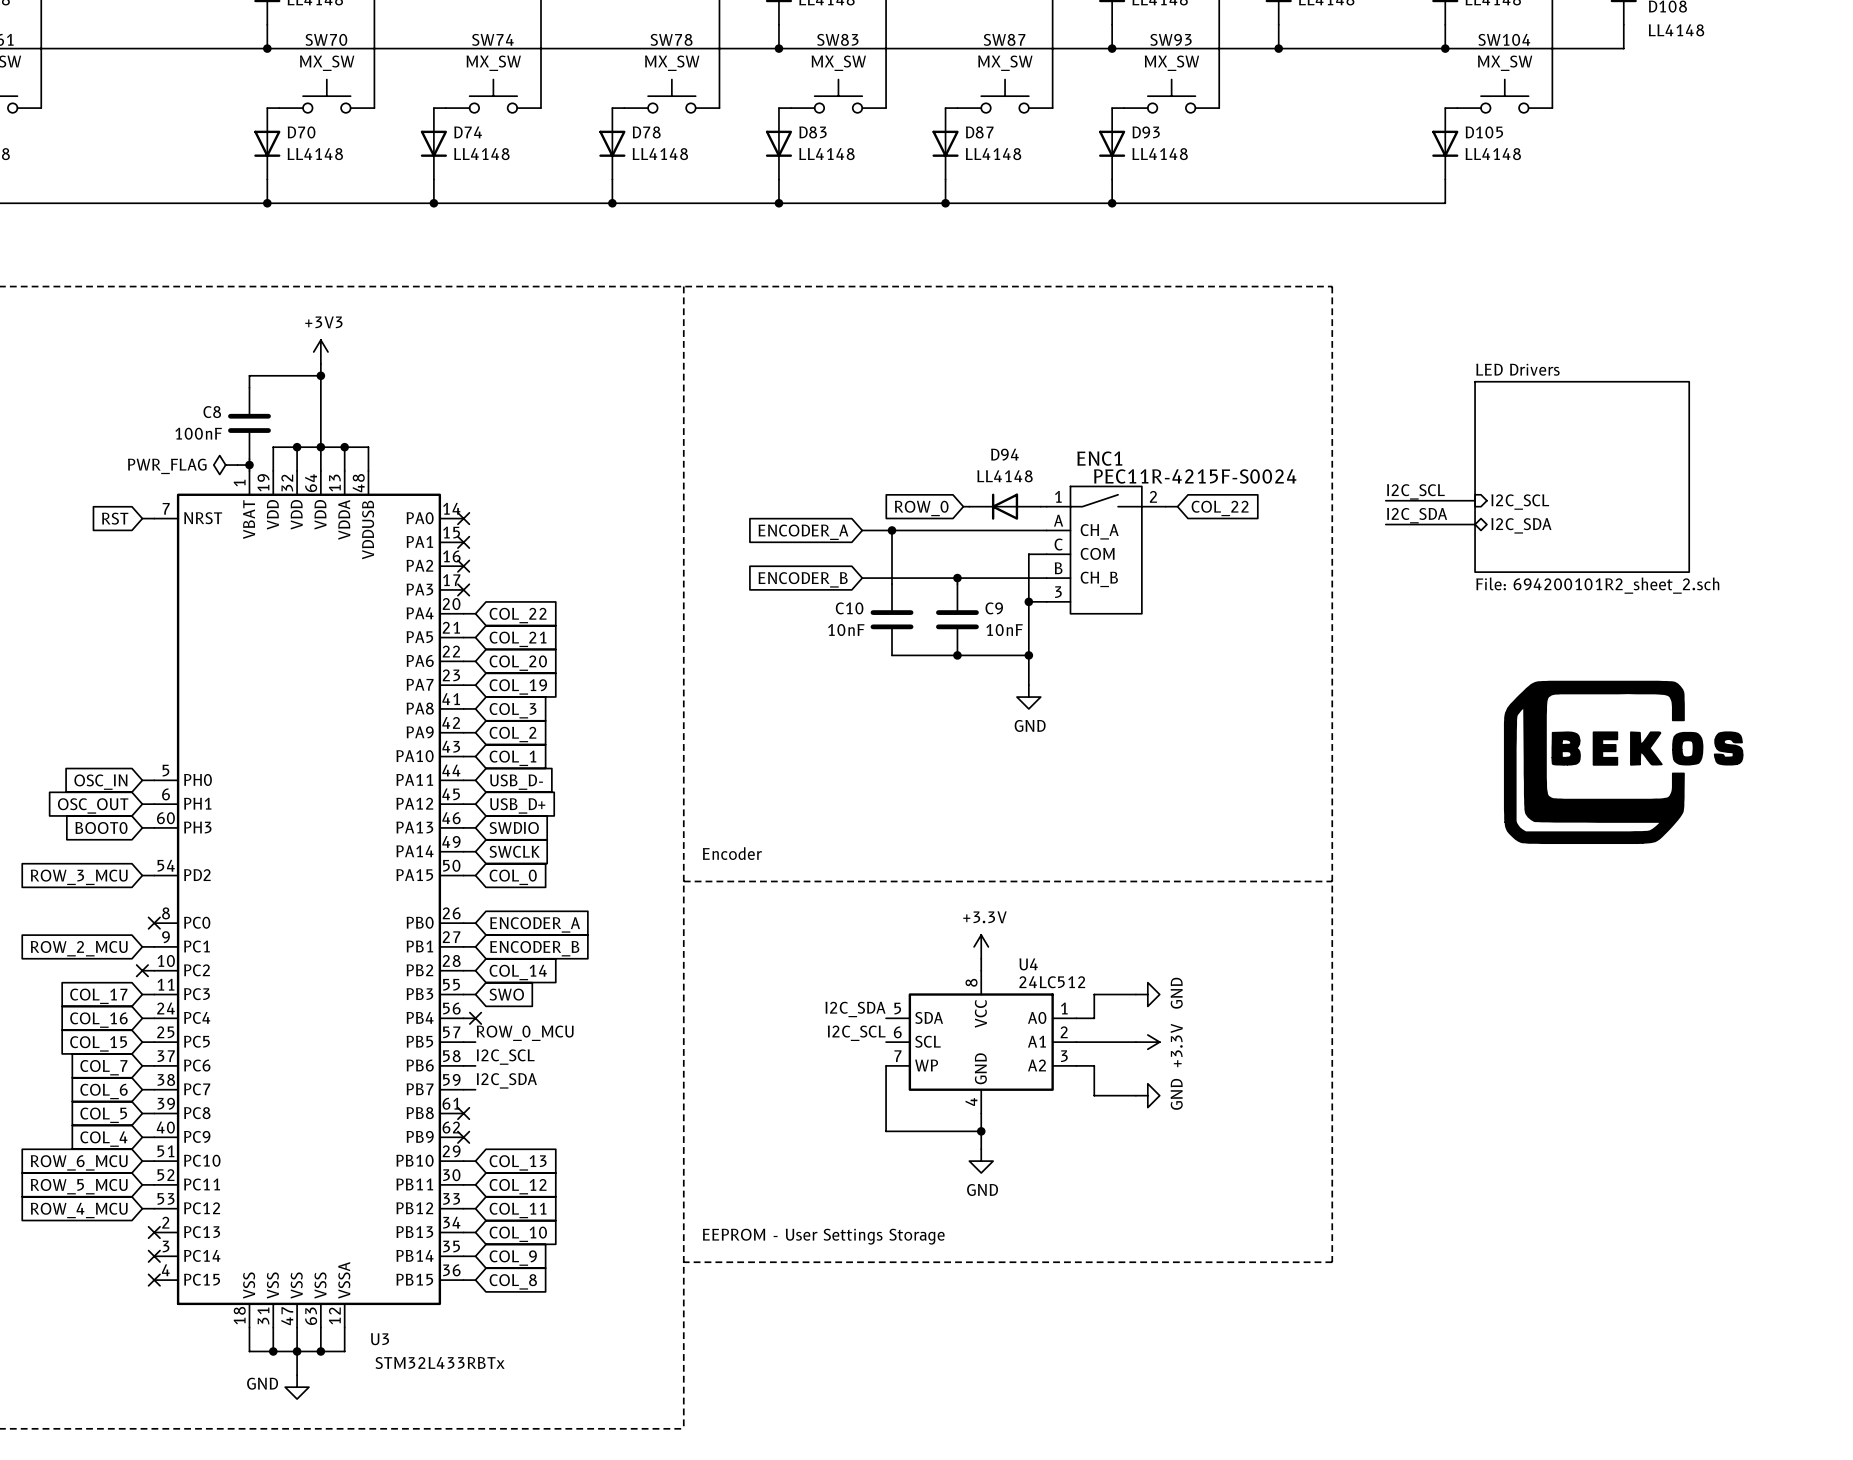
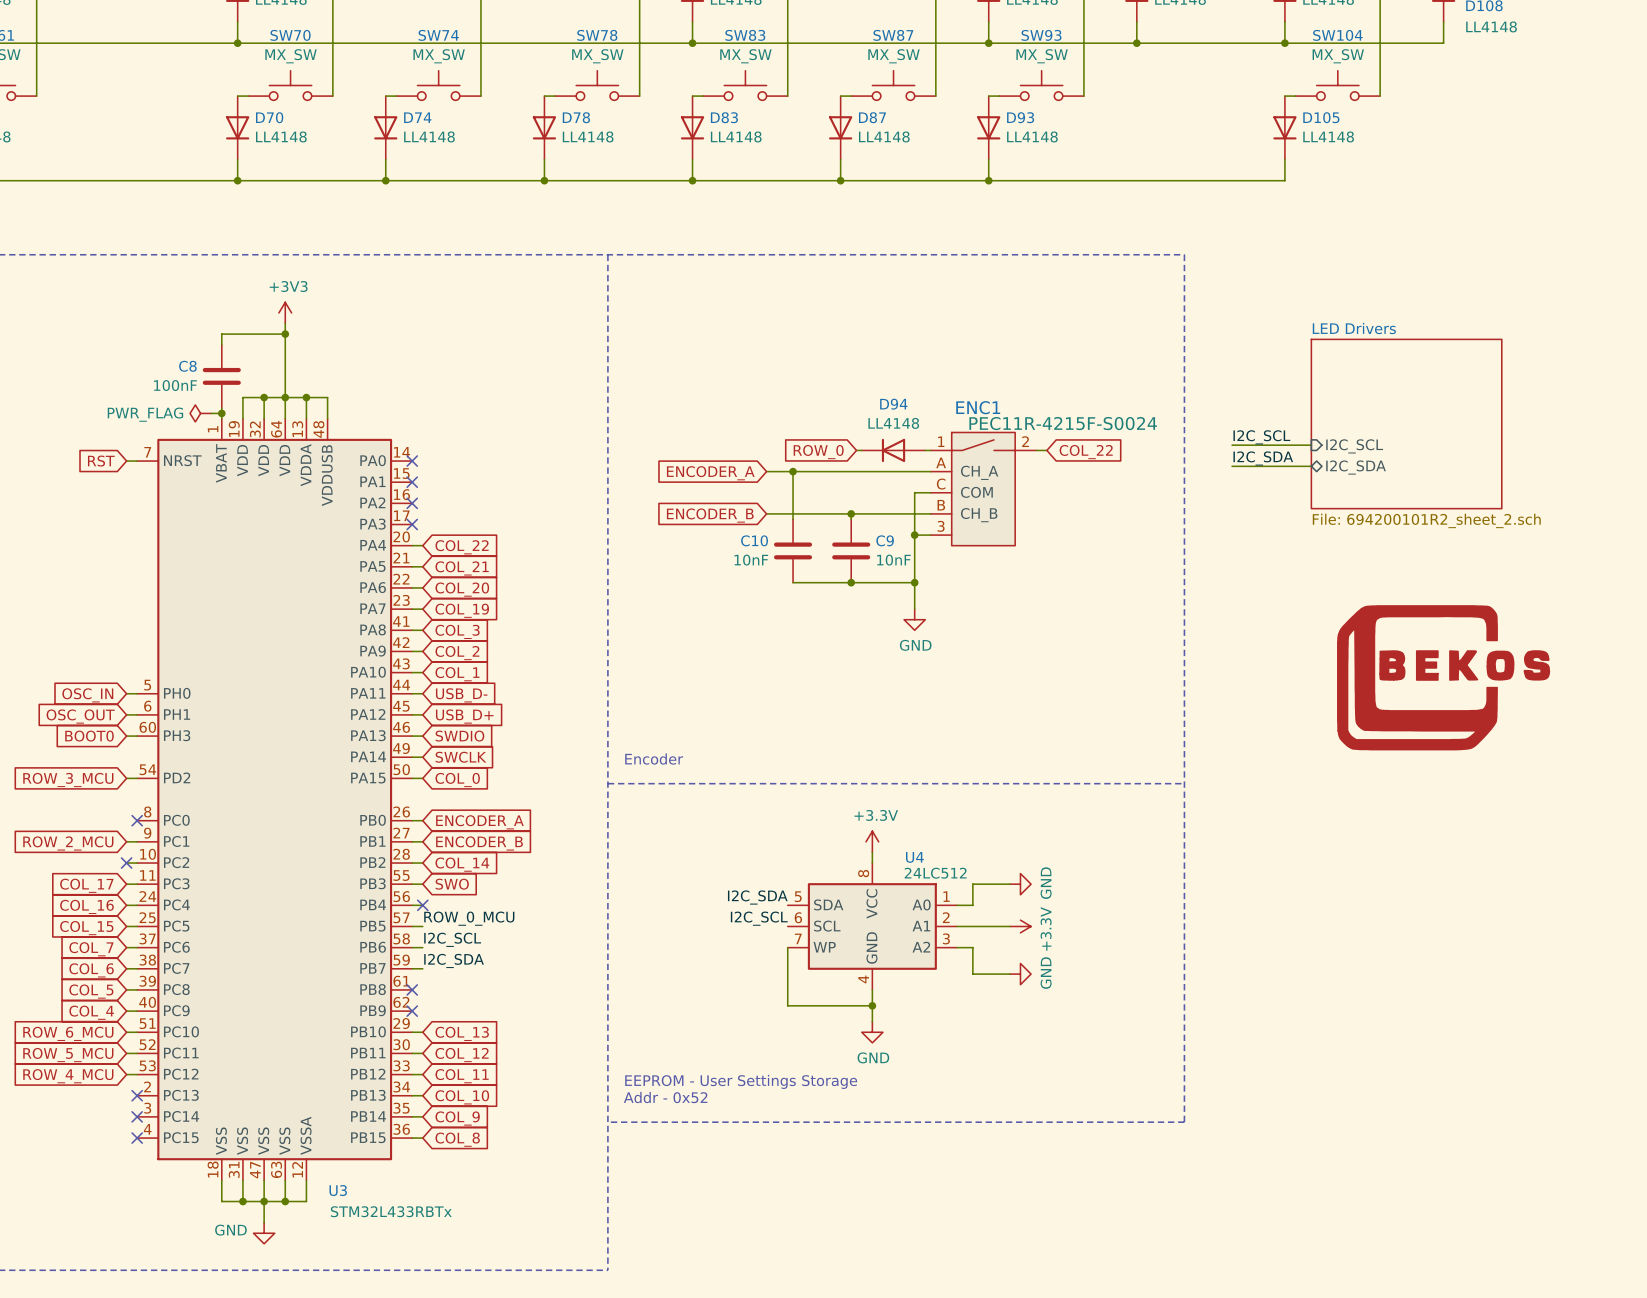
text: none -> EEPROM - User Settings Storage (741, 1081)
text: EEPROM - User Settings Storage (823, 1236) -> Addr - 0x52 (665, 1097)

